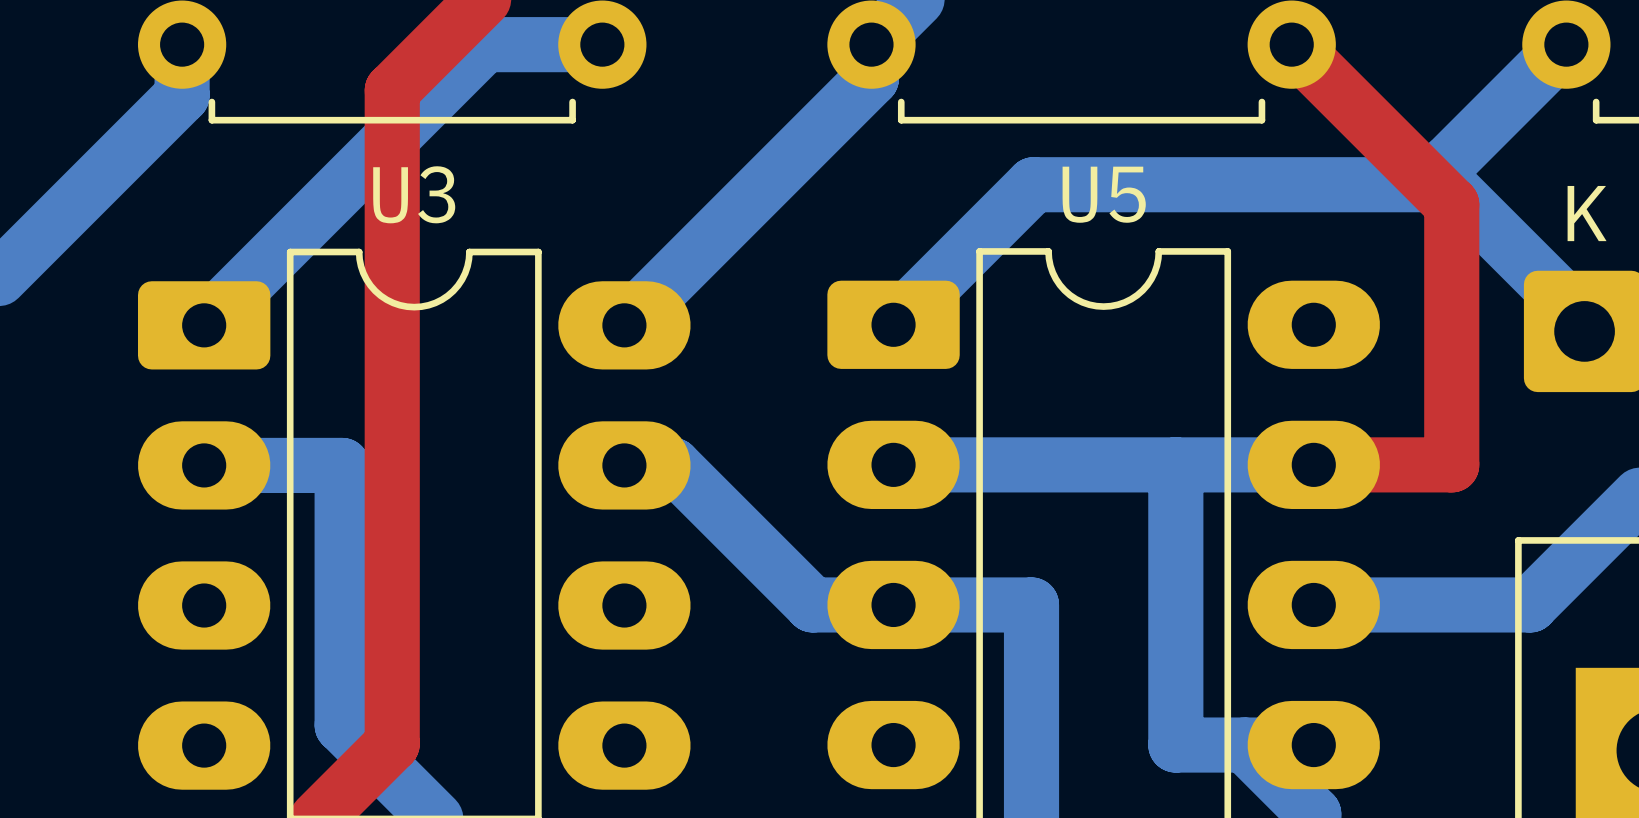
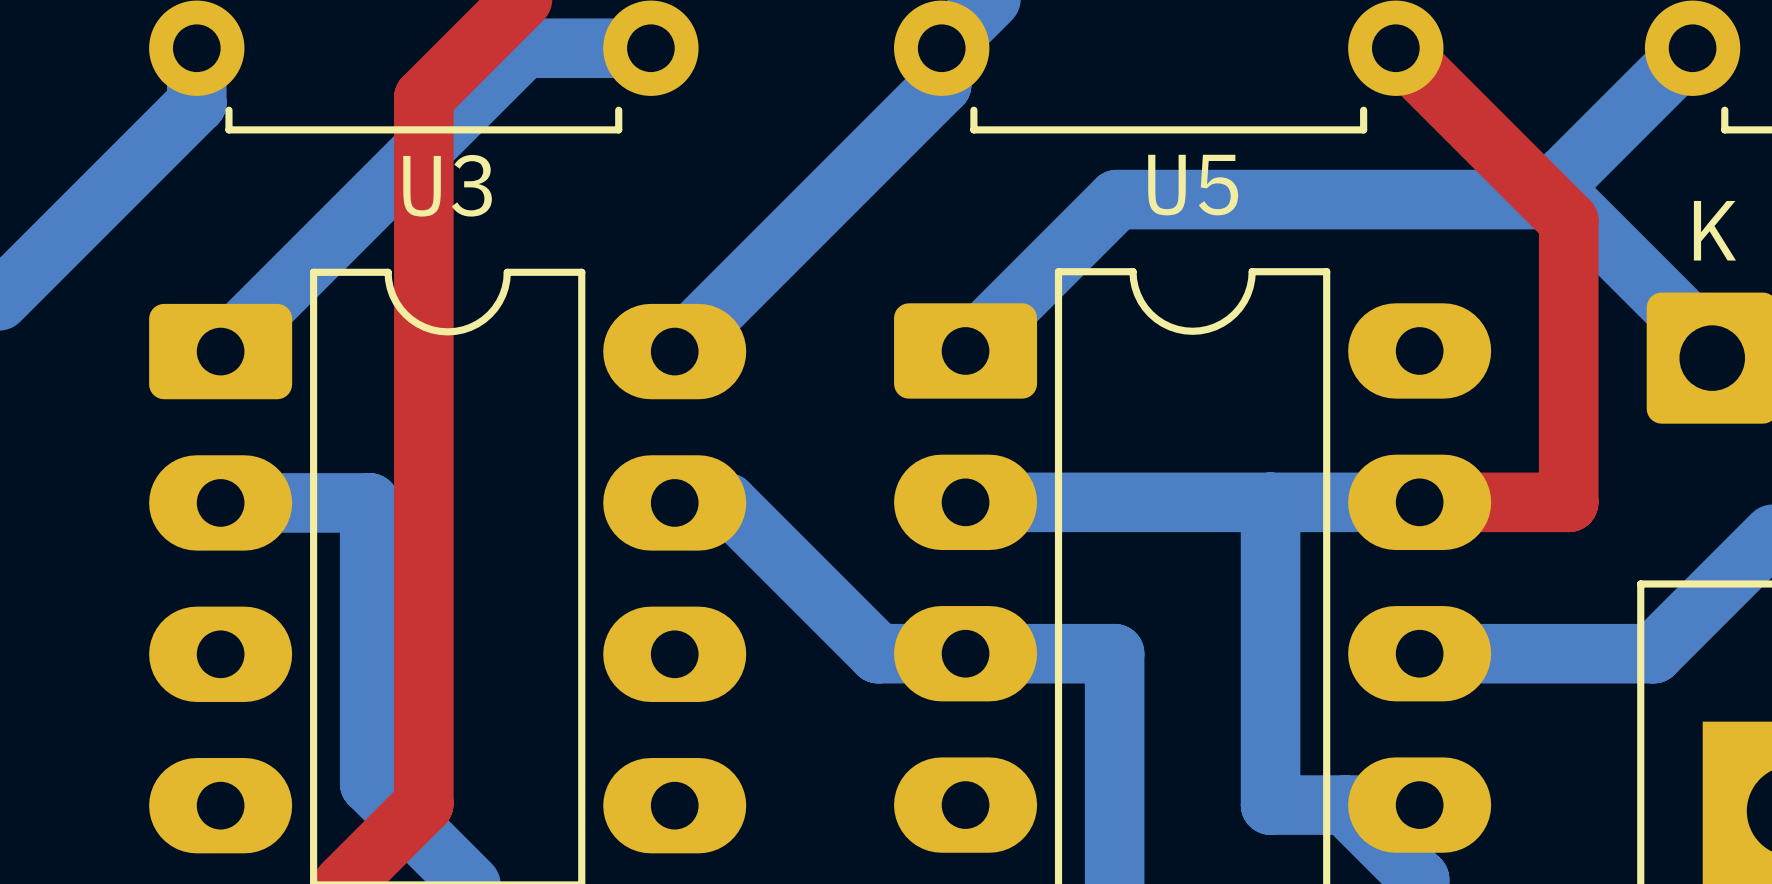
text: none -> U3 (447, 185)
text: none -> U5 (1193, 185)
U3 name: U3 (414, 194) -> none
U5 name: U5 (1104, 194) -> none

